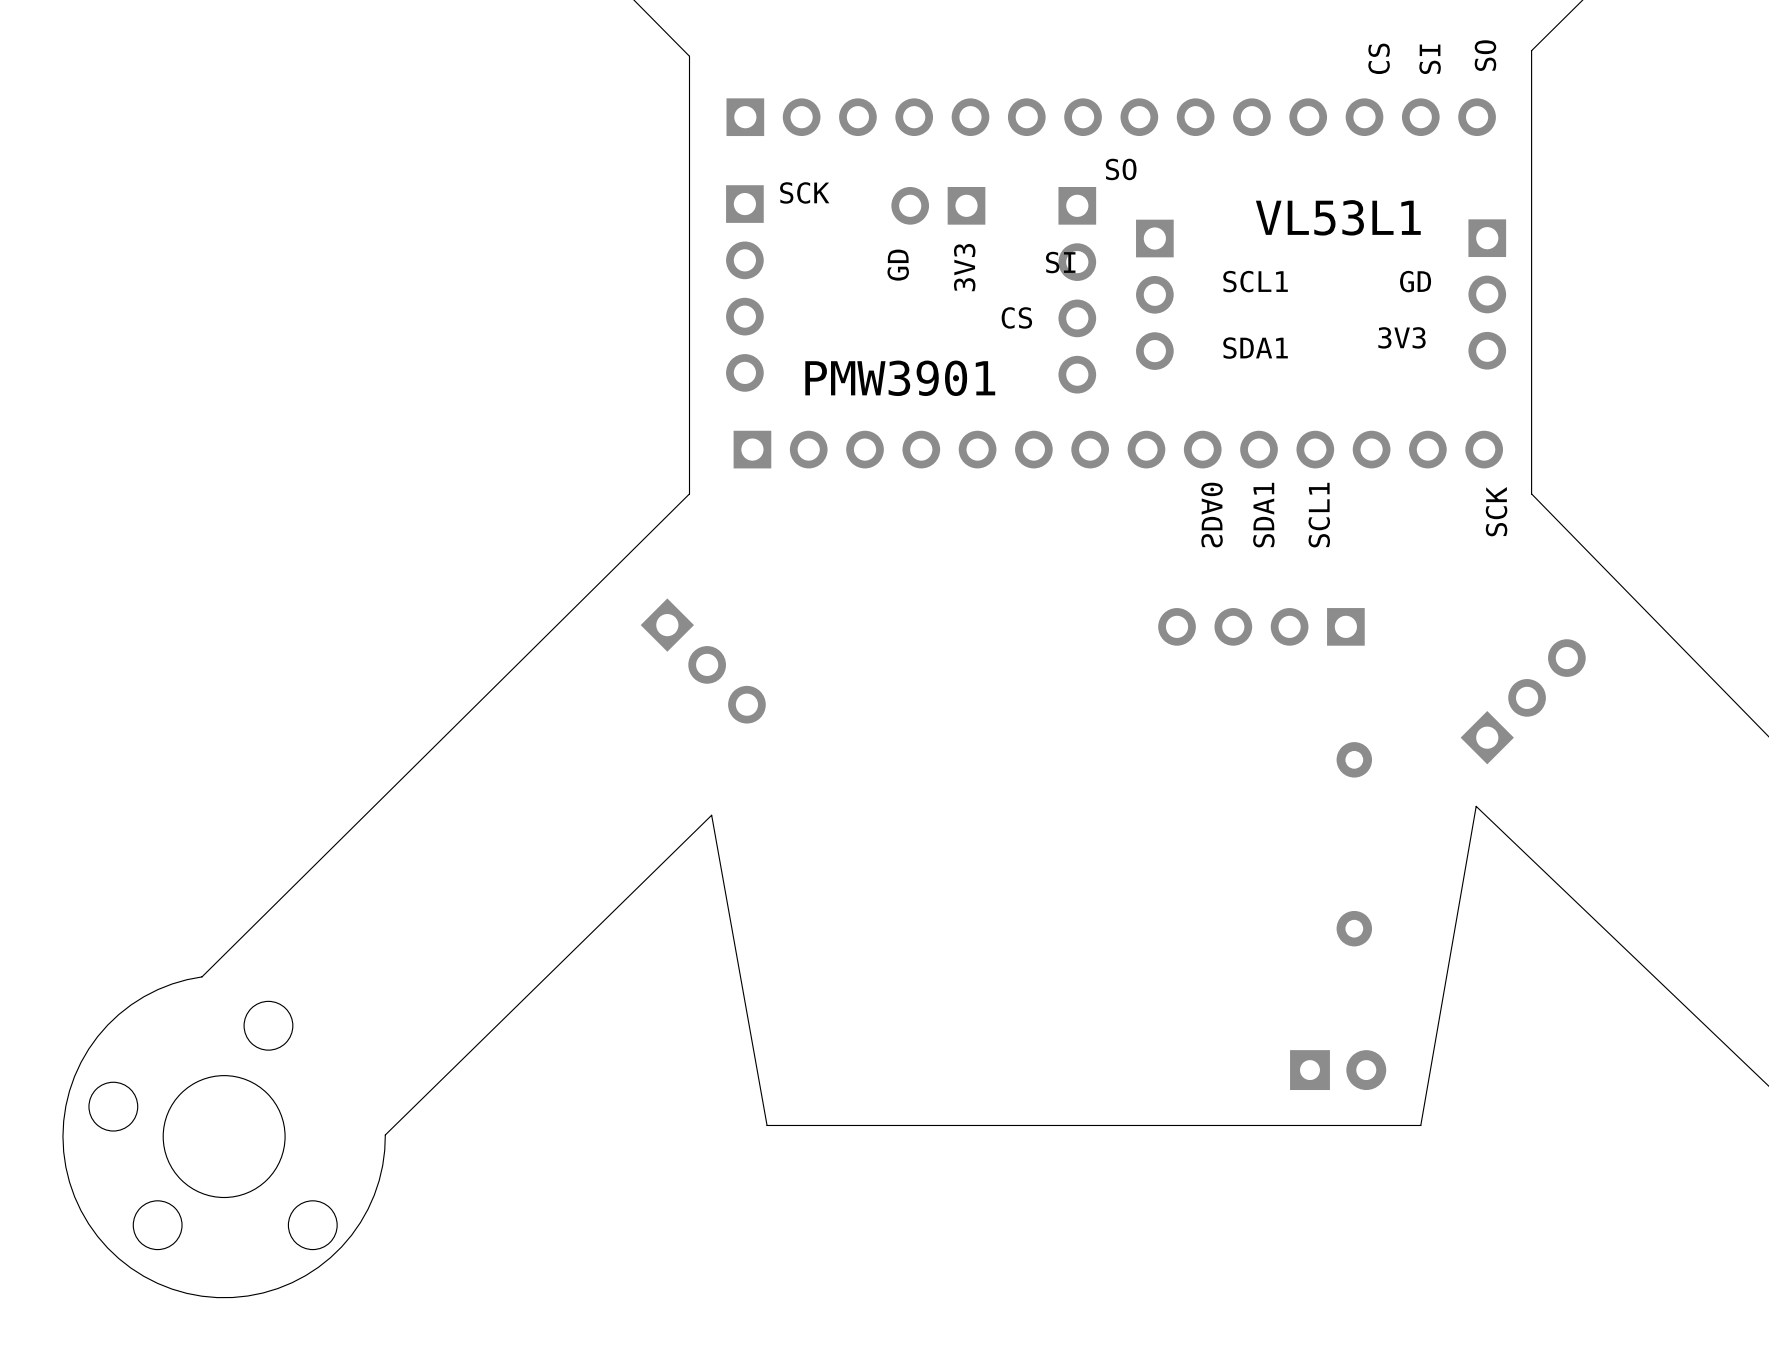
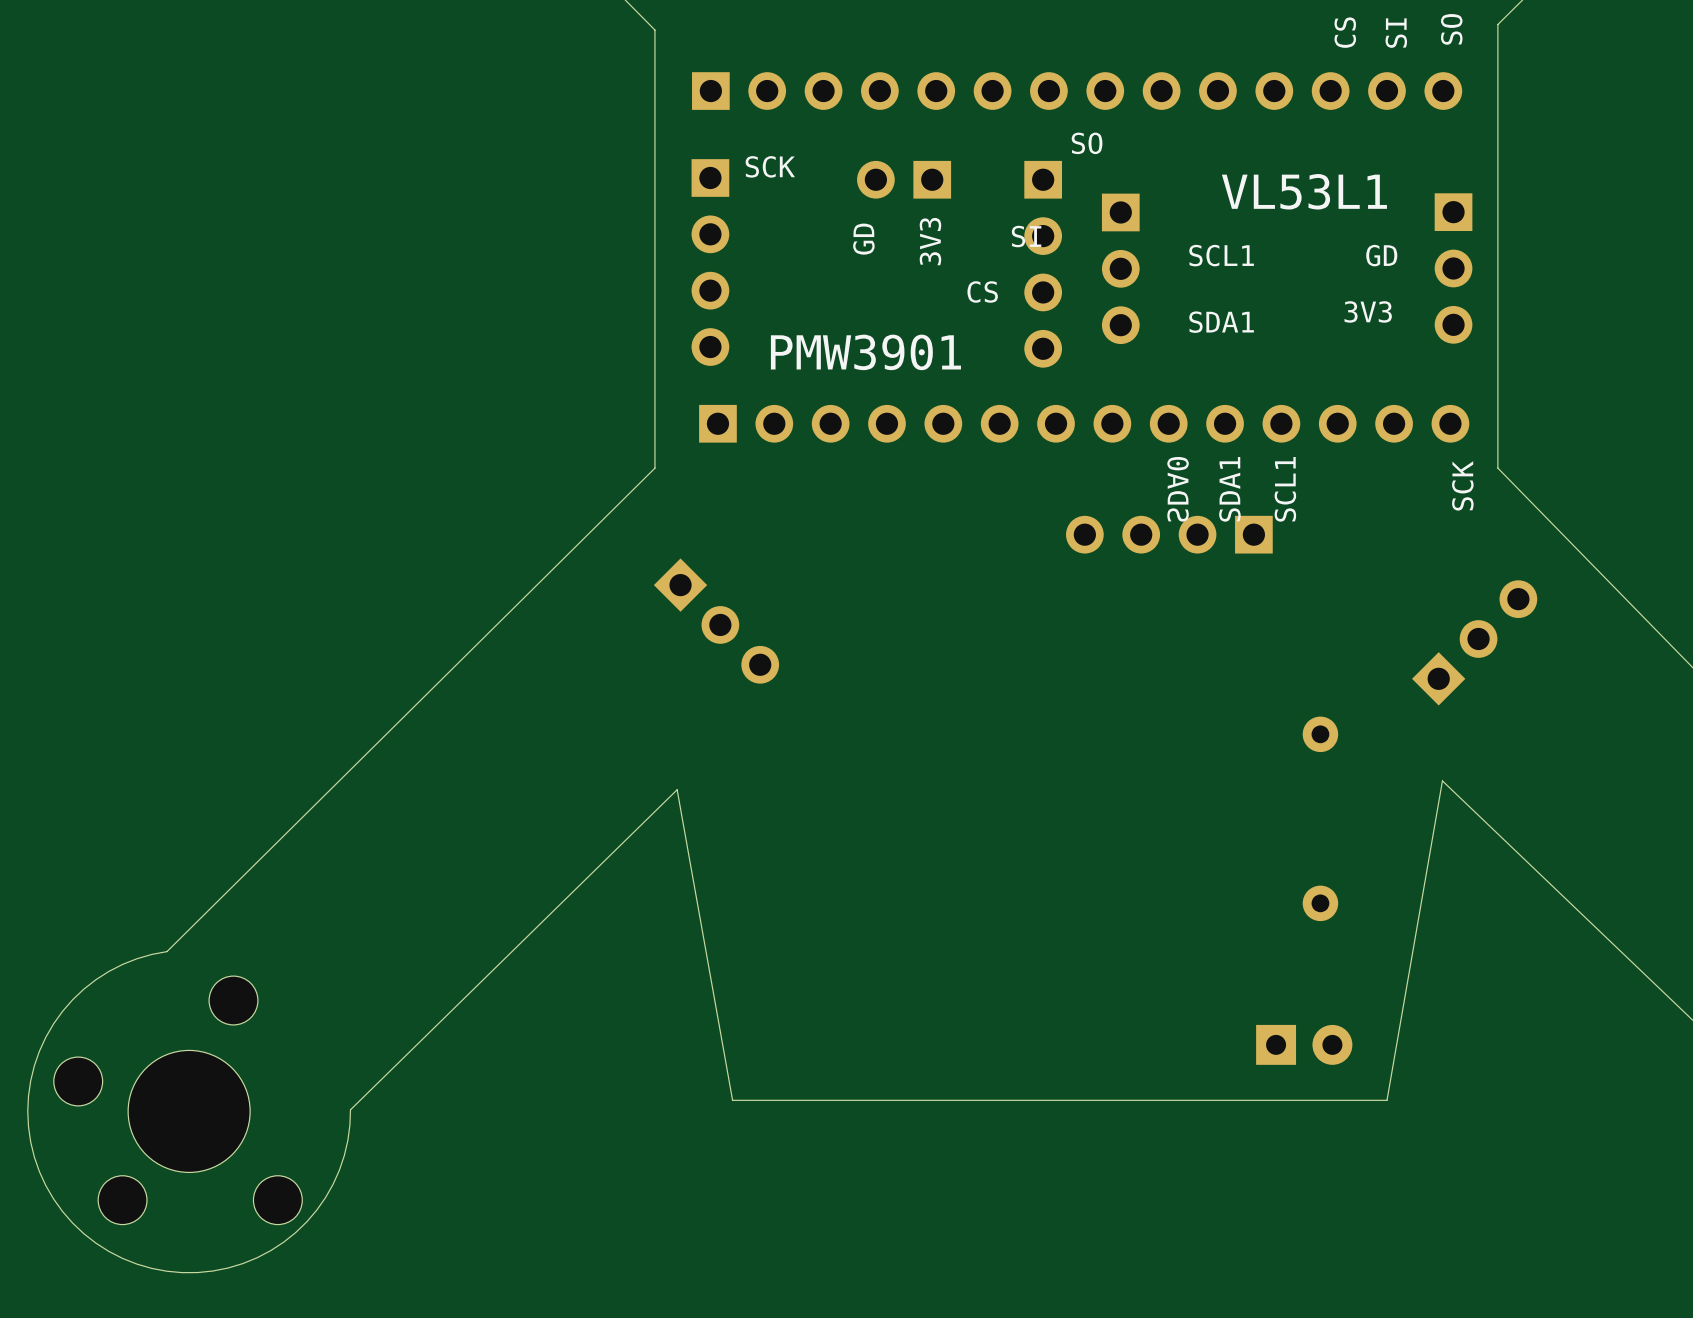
part position: (1261, 626) -> (1169, 534)
part position: (703, 661) -> (716, 621)
part position: (1523, 701) -> (1474, 642)

